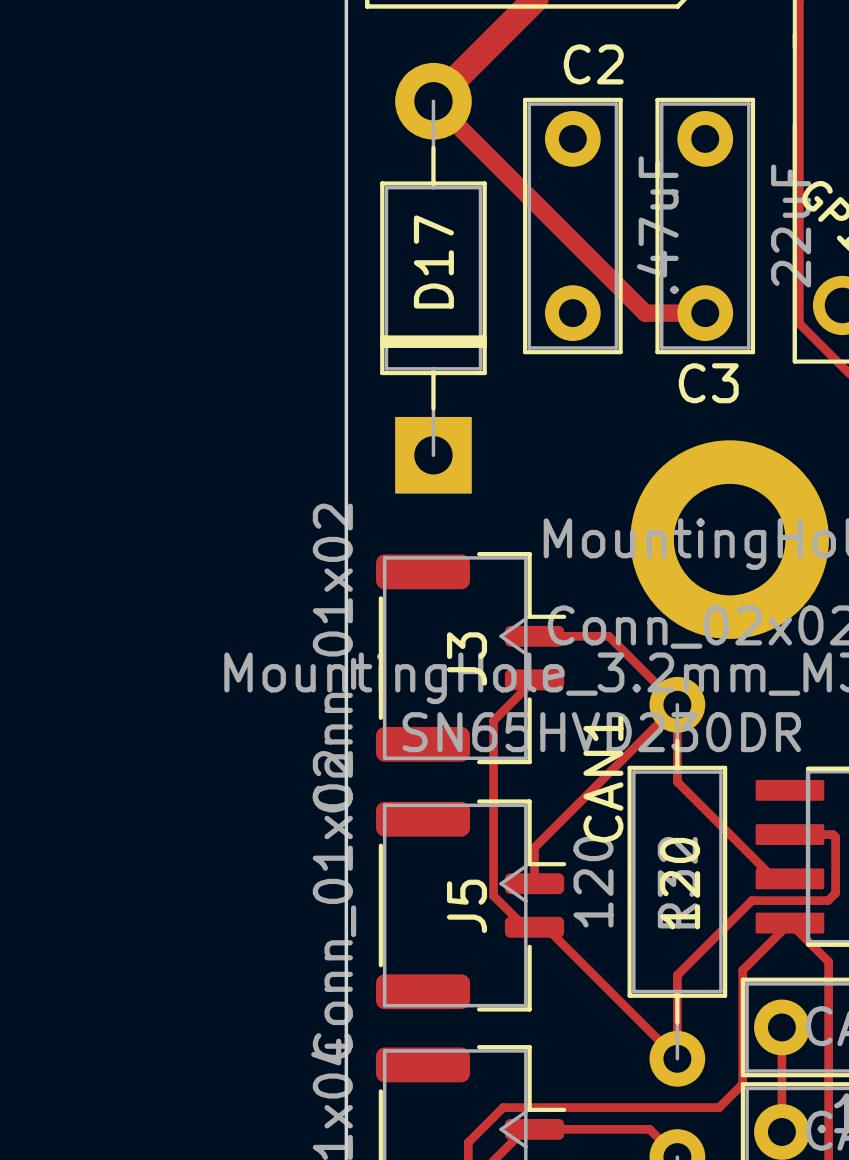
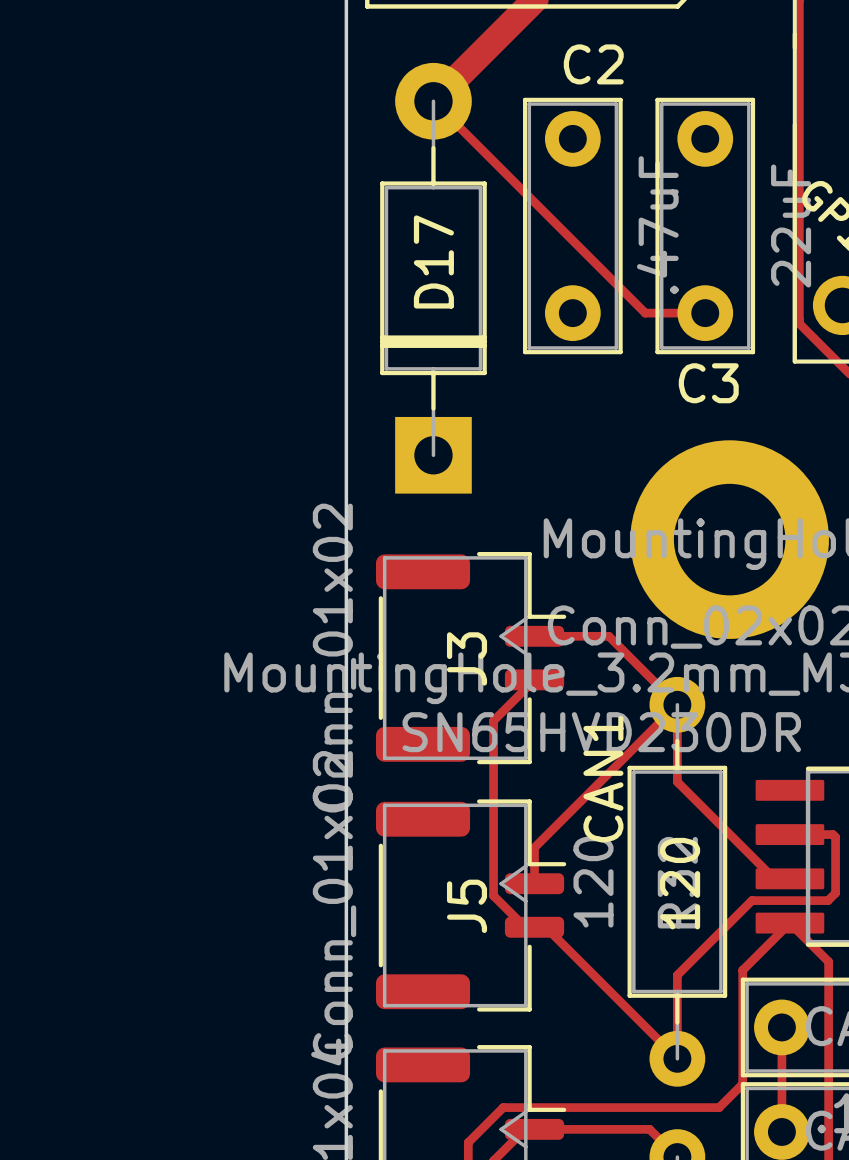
track width: thick (433, 101) (645, 313) (705, 313) -> thin (433, 101) (645, 313) (705, 313)

